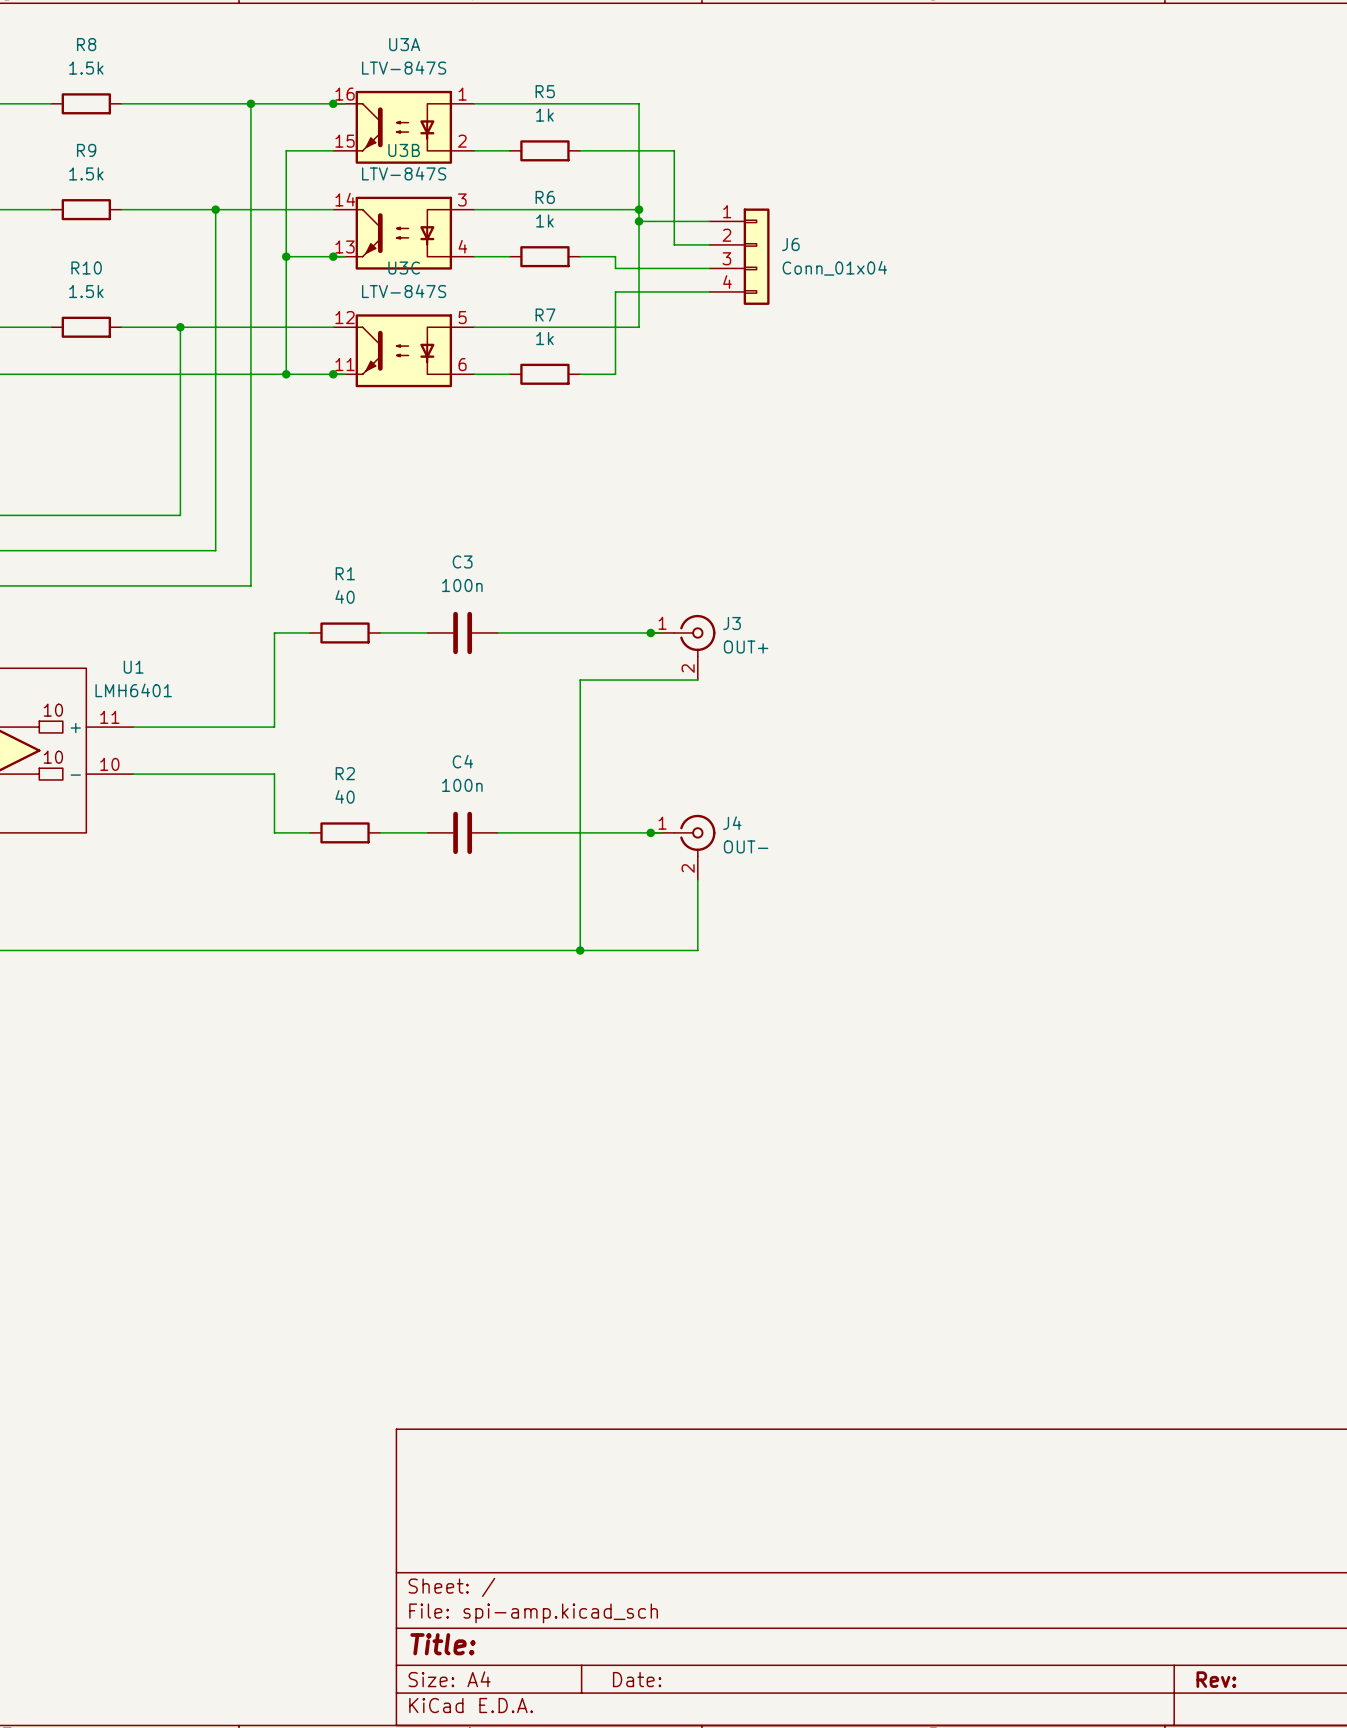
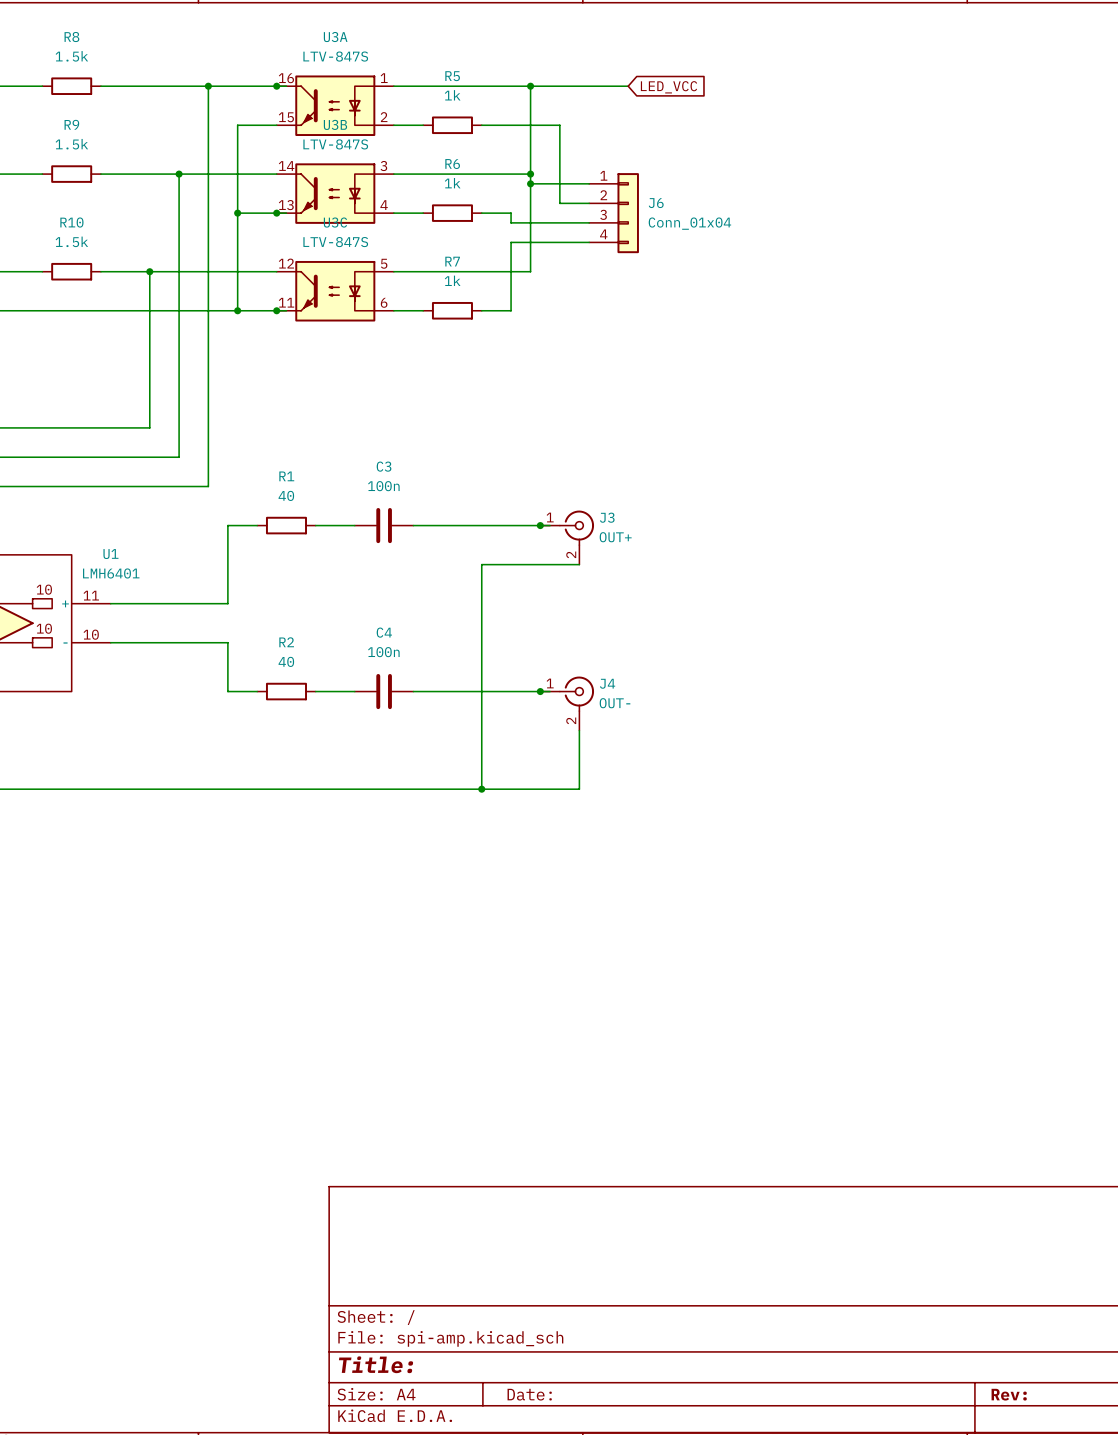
wire: none -> (530, 86) (628, 86)
junction: none -> (530, 86)
global label: none -> LED_VCC (668, 87)

